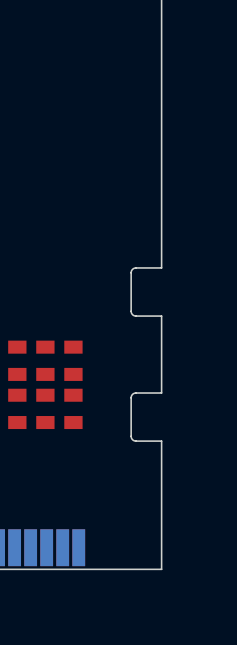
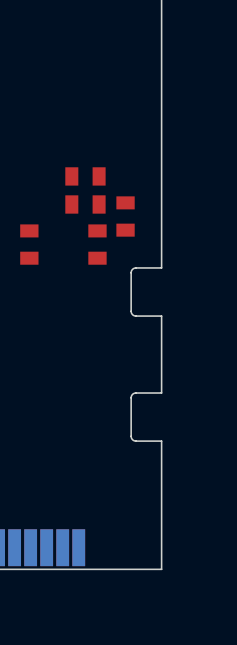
part: none -> (85, 176)
part: none -> (85, 204)
part: none -> (125, 216)
part: none -> (29, 244)
part: none -> (97, 244)
part: (17, 360) -> none
part: (45, 360) -> none
part: (73, 360) -> none
part: (17, 408) -> none
part: (45, 408) -> none
part: (73, 408) -> none

